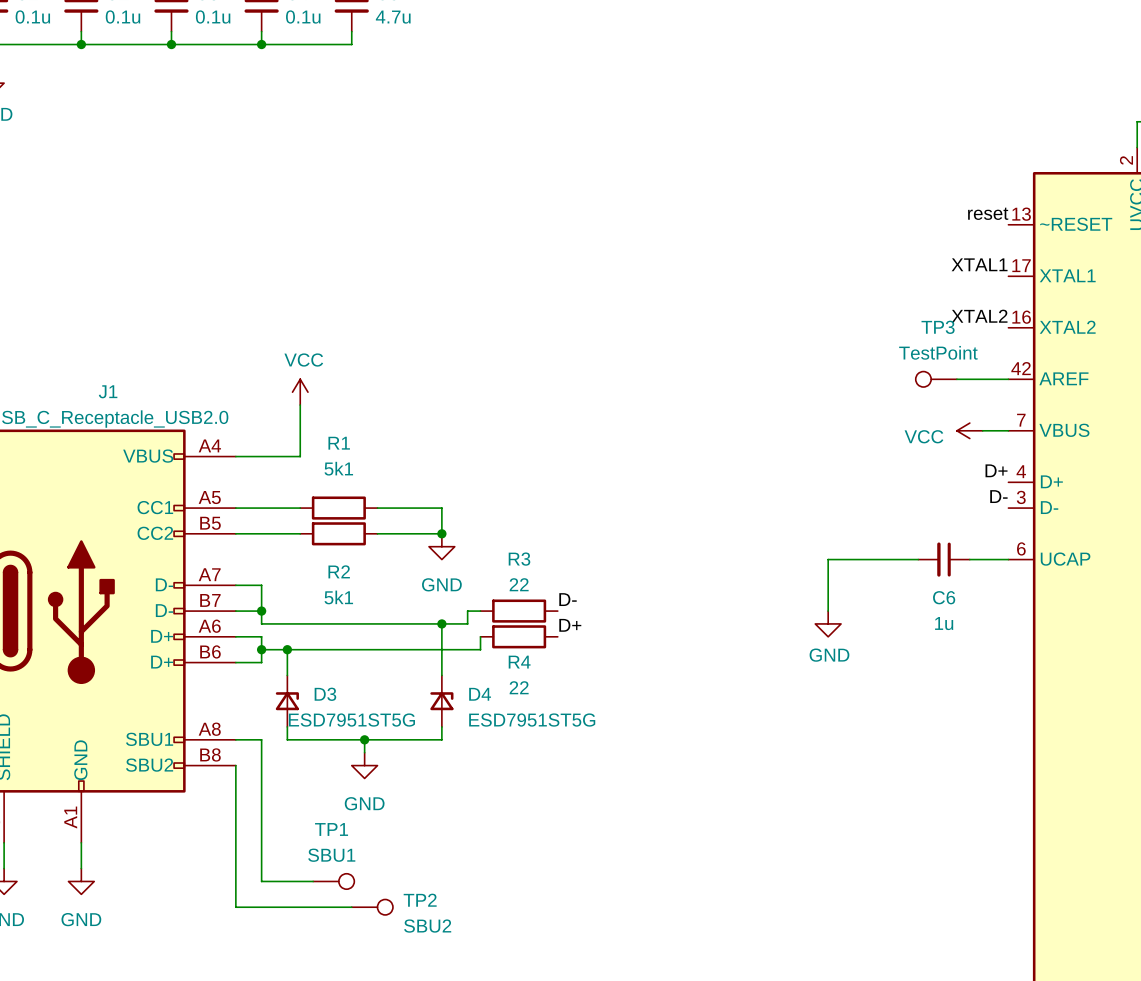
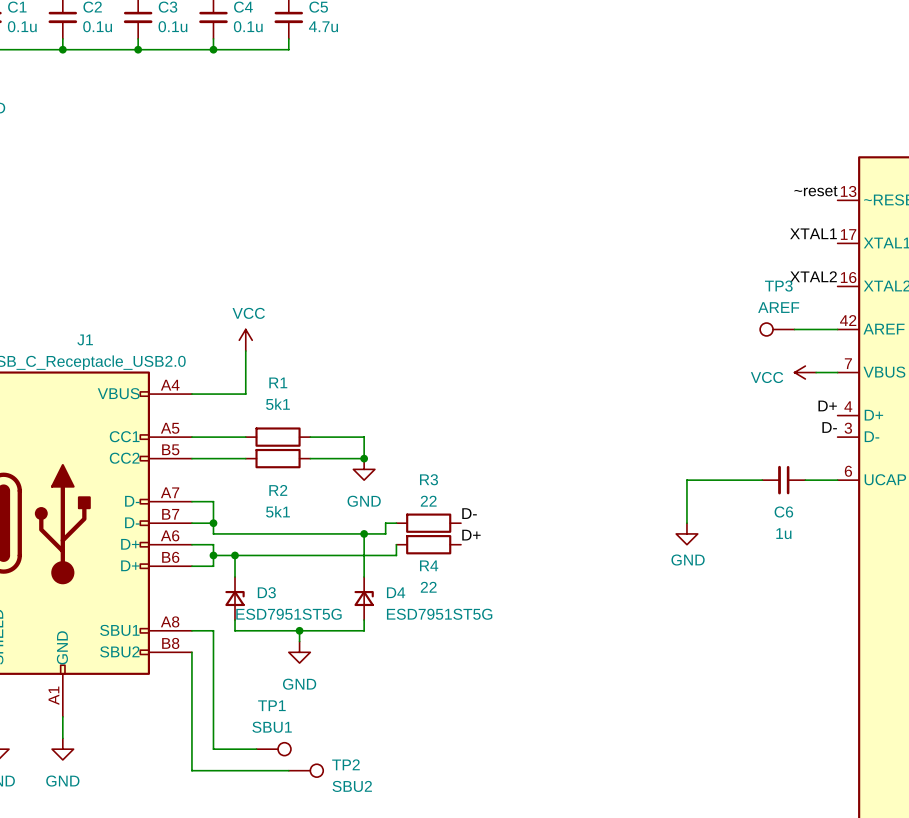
label: reset (988, 213) -> ~reset (815, 191)
TP3 value: TestPoint (938, 352) -> AREF (778, 307)

